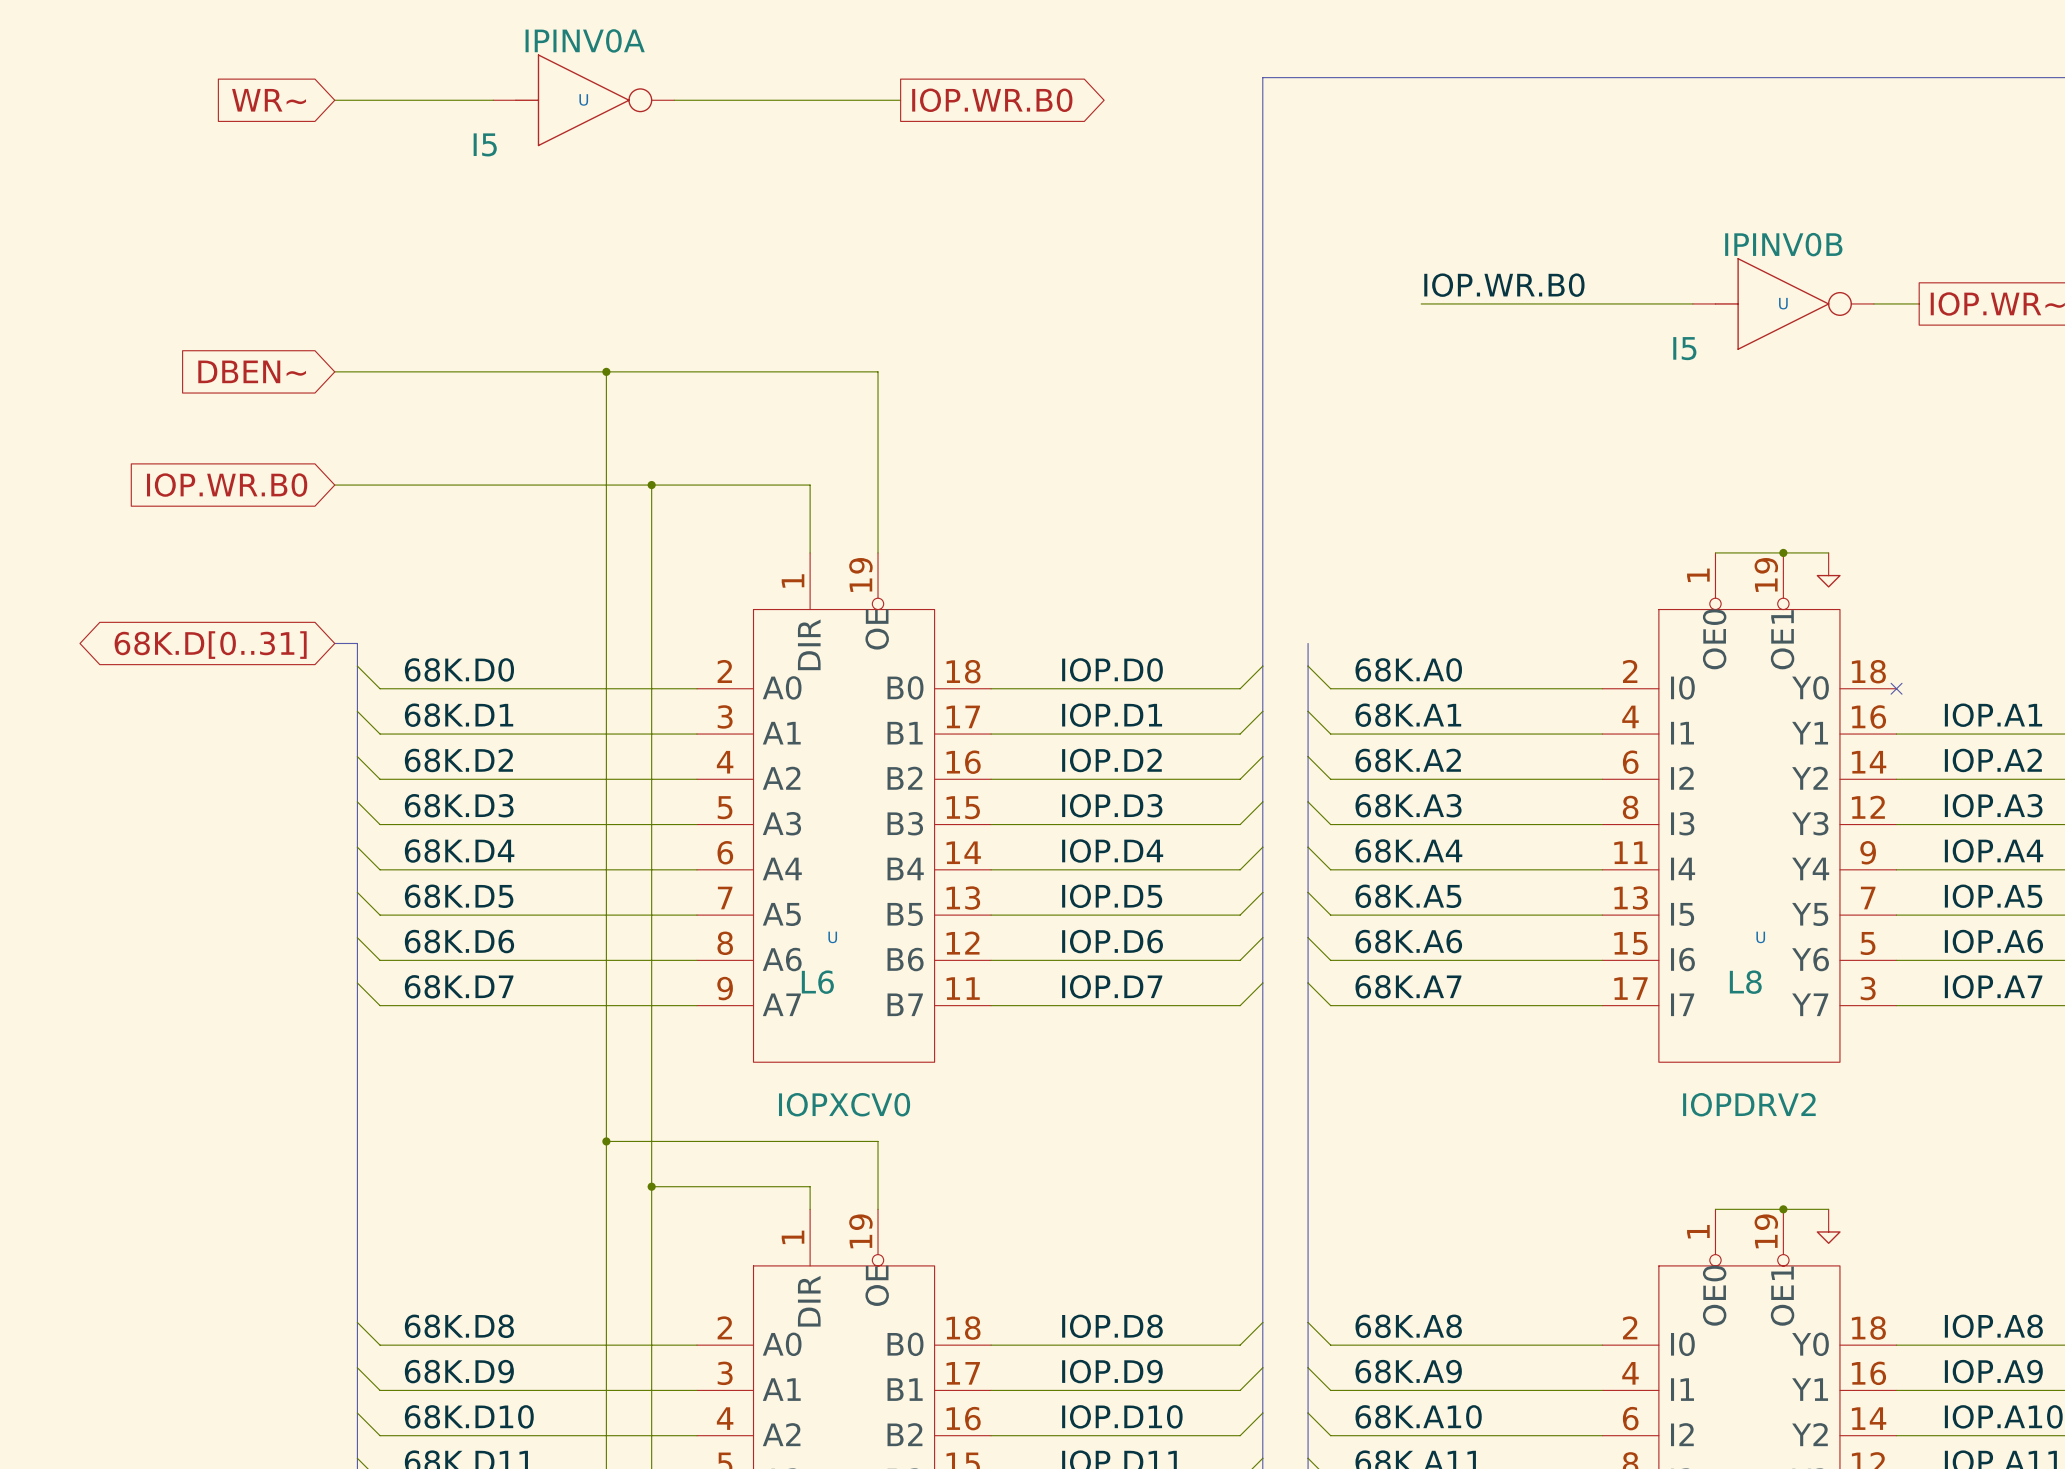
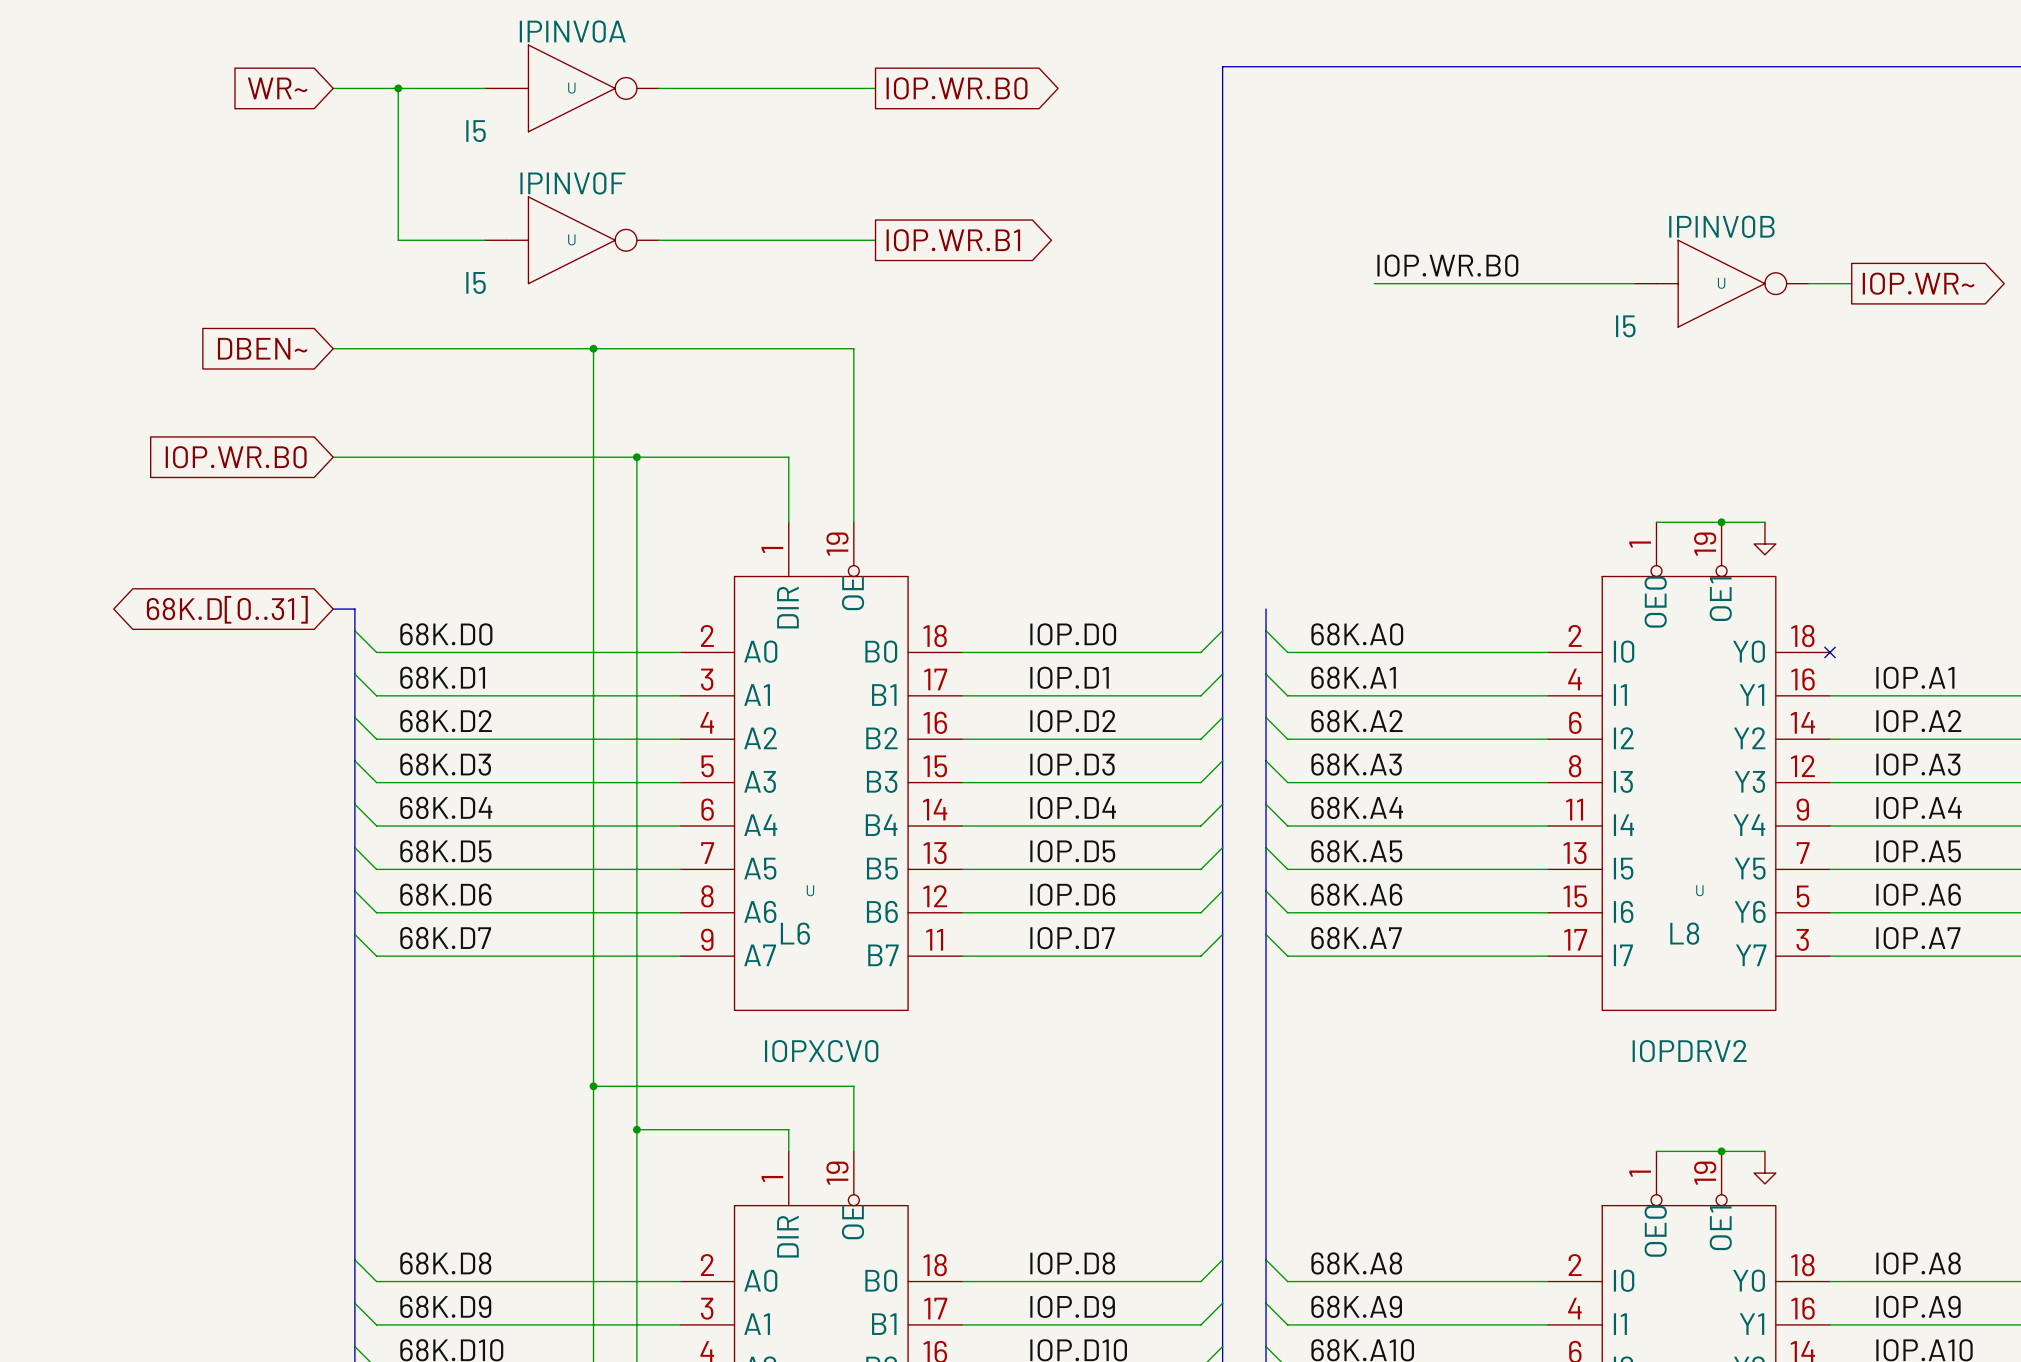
wire: none -> (398, 88) (398, 240) (485, 240)
junction: none -> (398, 88)
U: none -> (571, 240)
wire: none -> (658, 240) (875, 240)
global label: none -> IOP.WR.B1 (953, 240)

